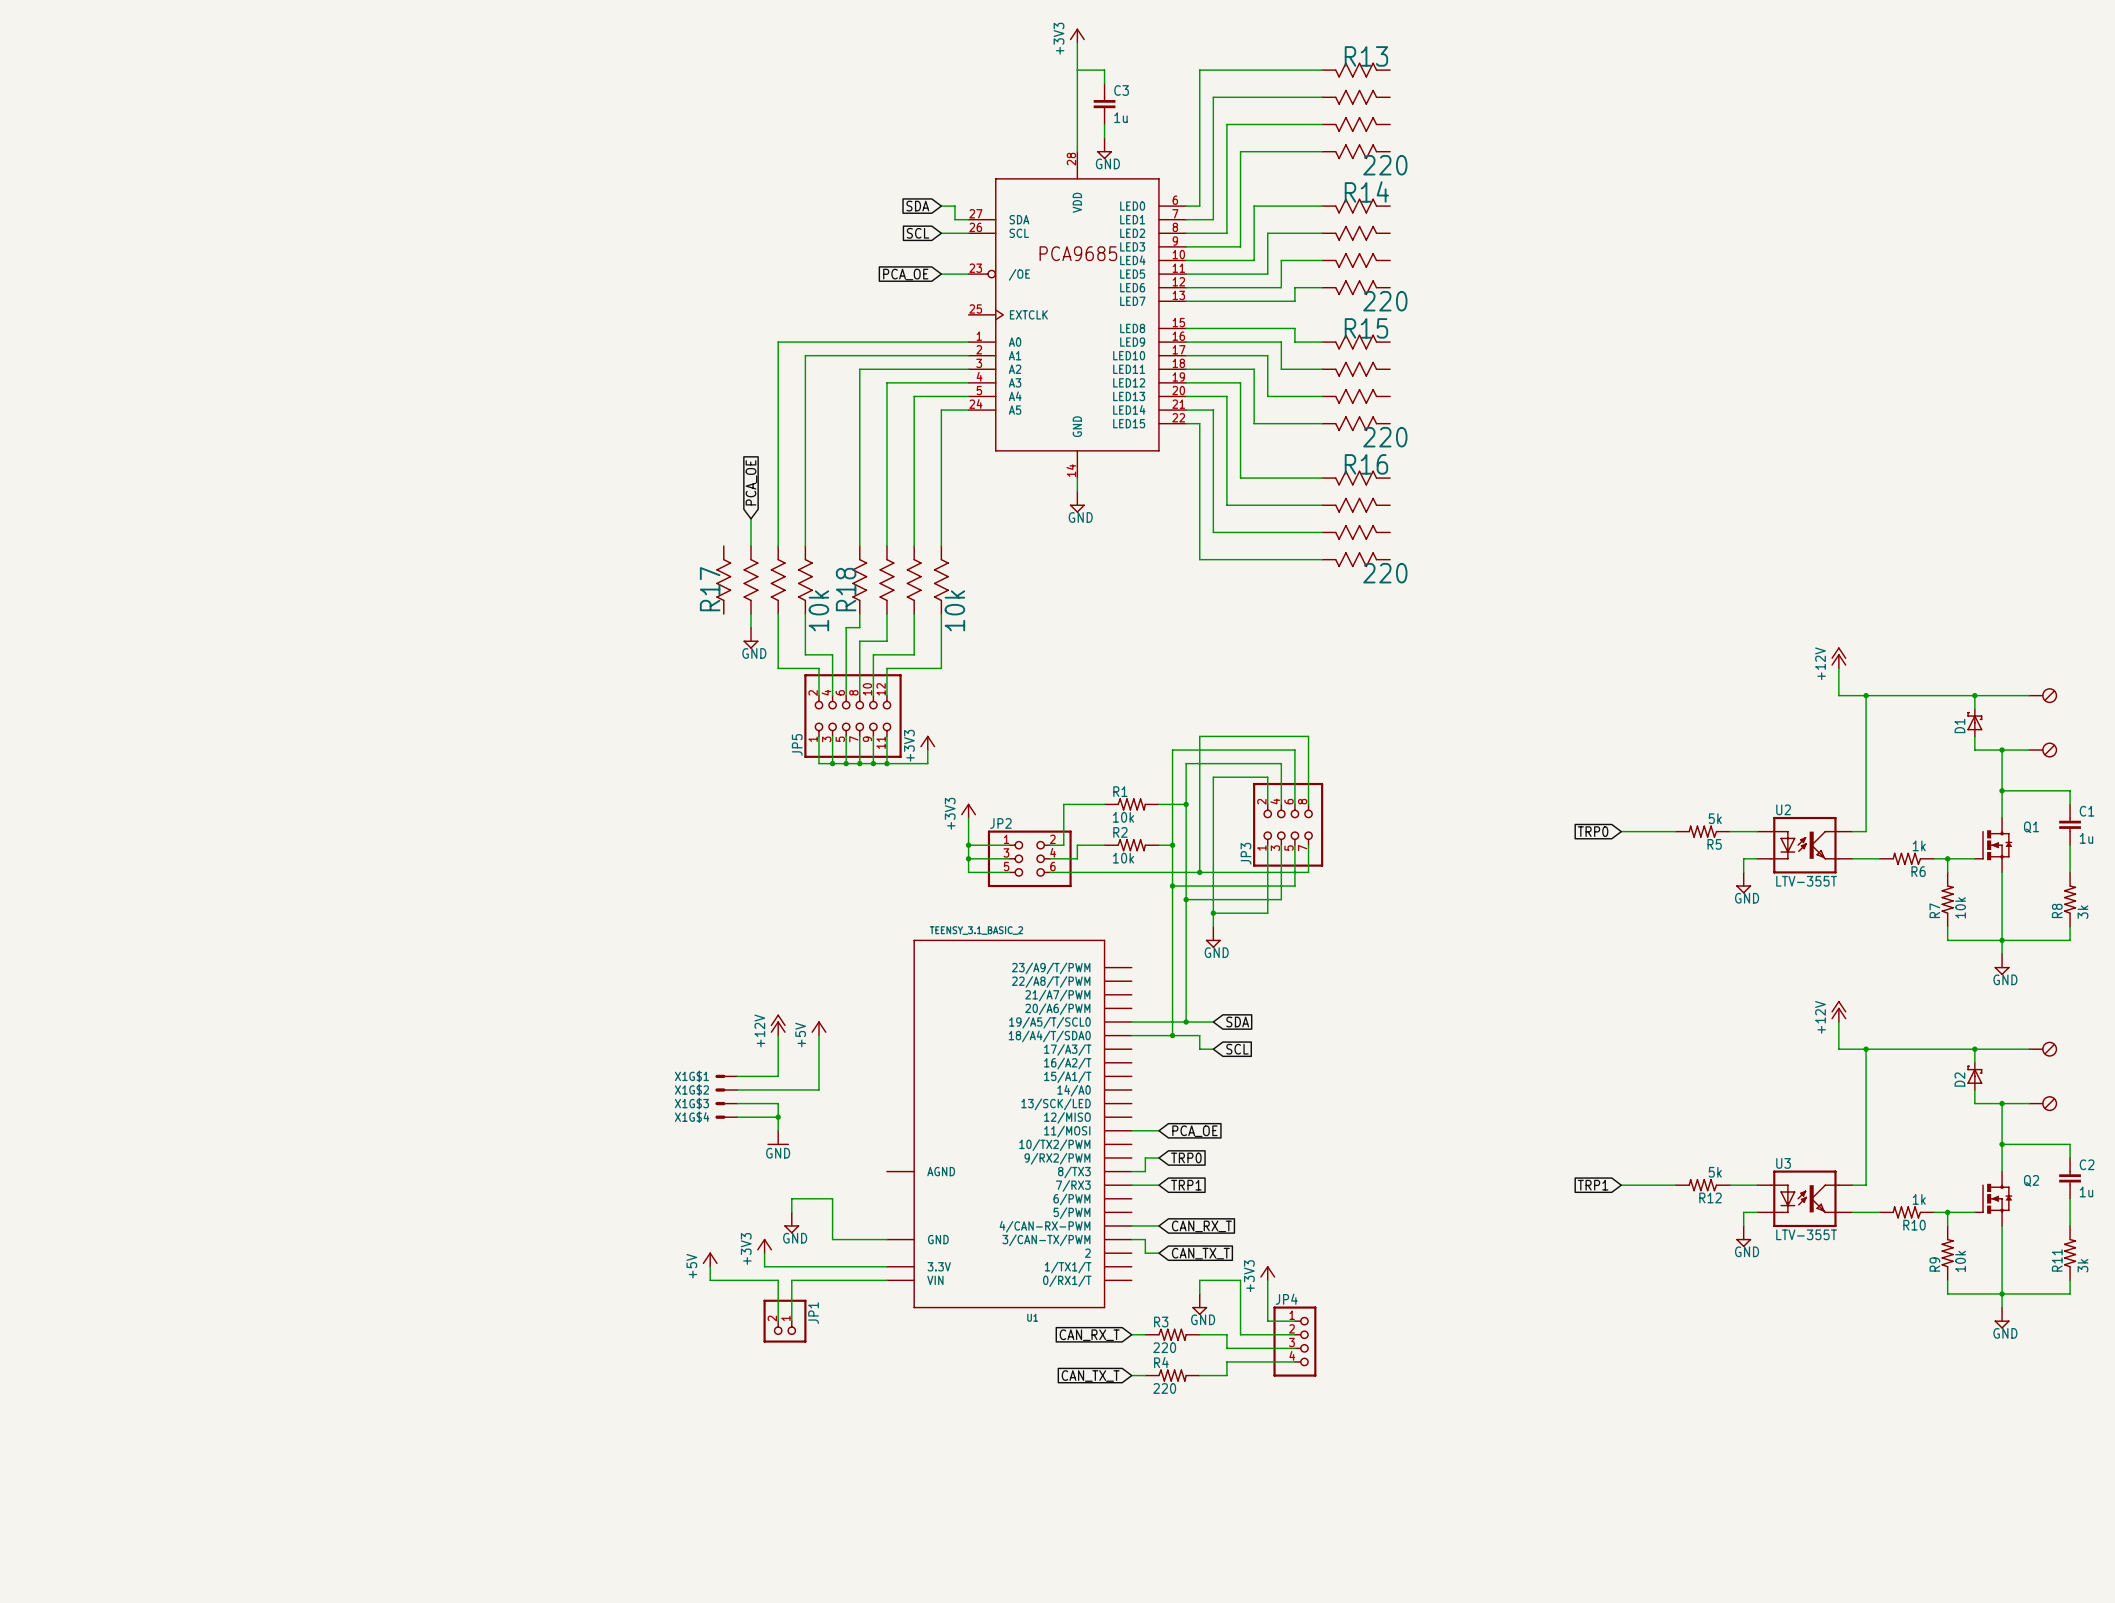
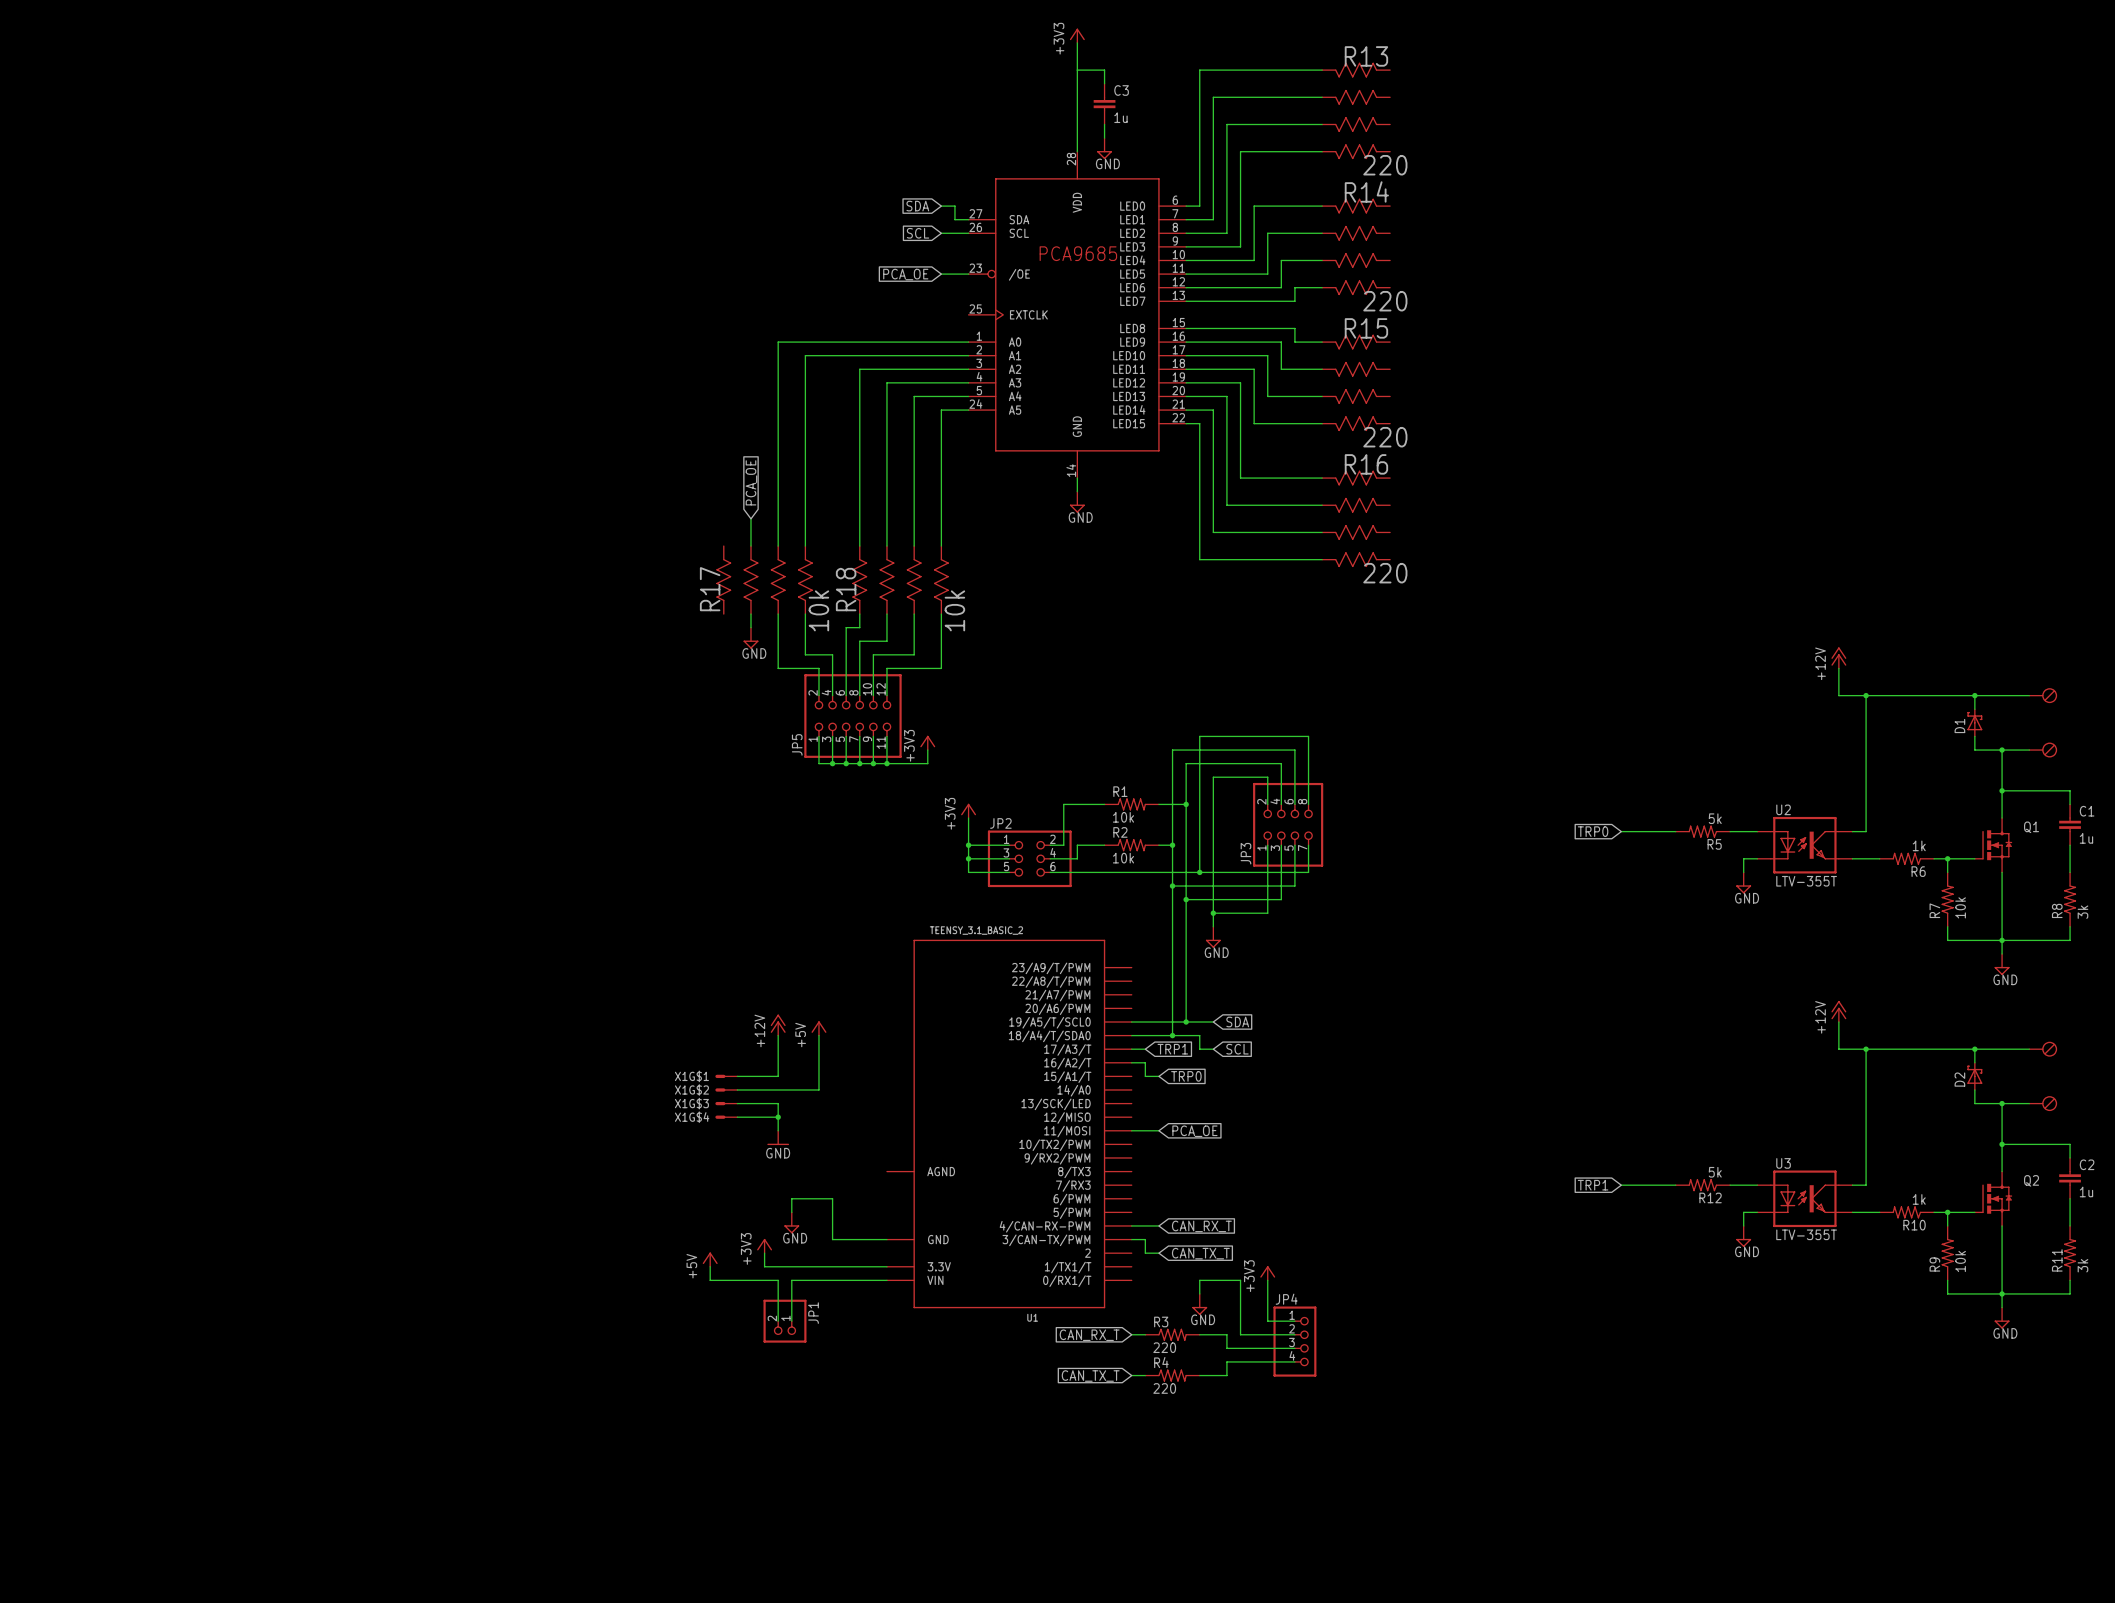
wire: none -> (1131, 1049) (1145, 1049)
global label: none -> TRP1 (1172, 1049)
wire: none -> (1131, 1062) (1145, 1062) (1145, 1076) (1158, 1076)
wire: (1158, 1157) (1145, 1157) (1145, 1171) (1131, 1171) -> none
global label position: TRP0 (1186, 1157) -> TRP0 (1186, 1076)
wire: (1131, 1185) (1158, 1185) -> none
global label: TRP1 (1186, 1185) -> none

